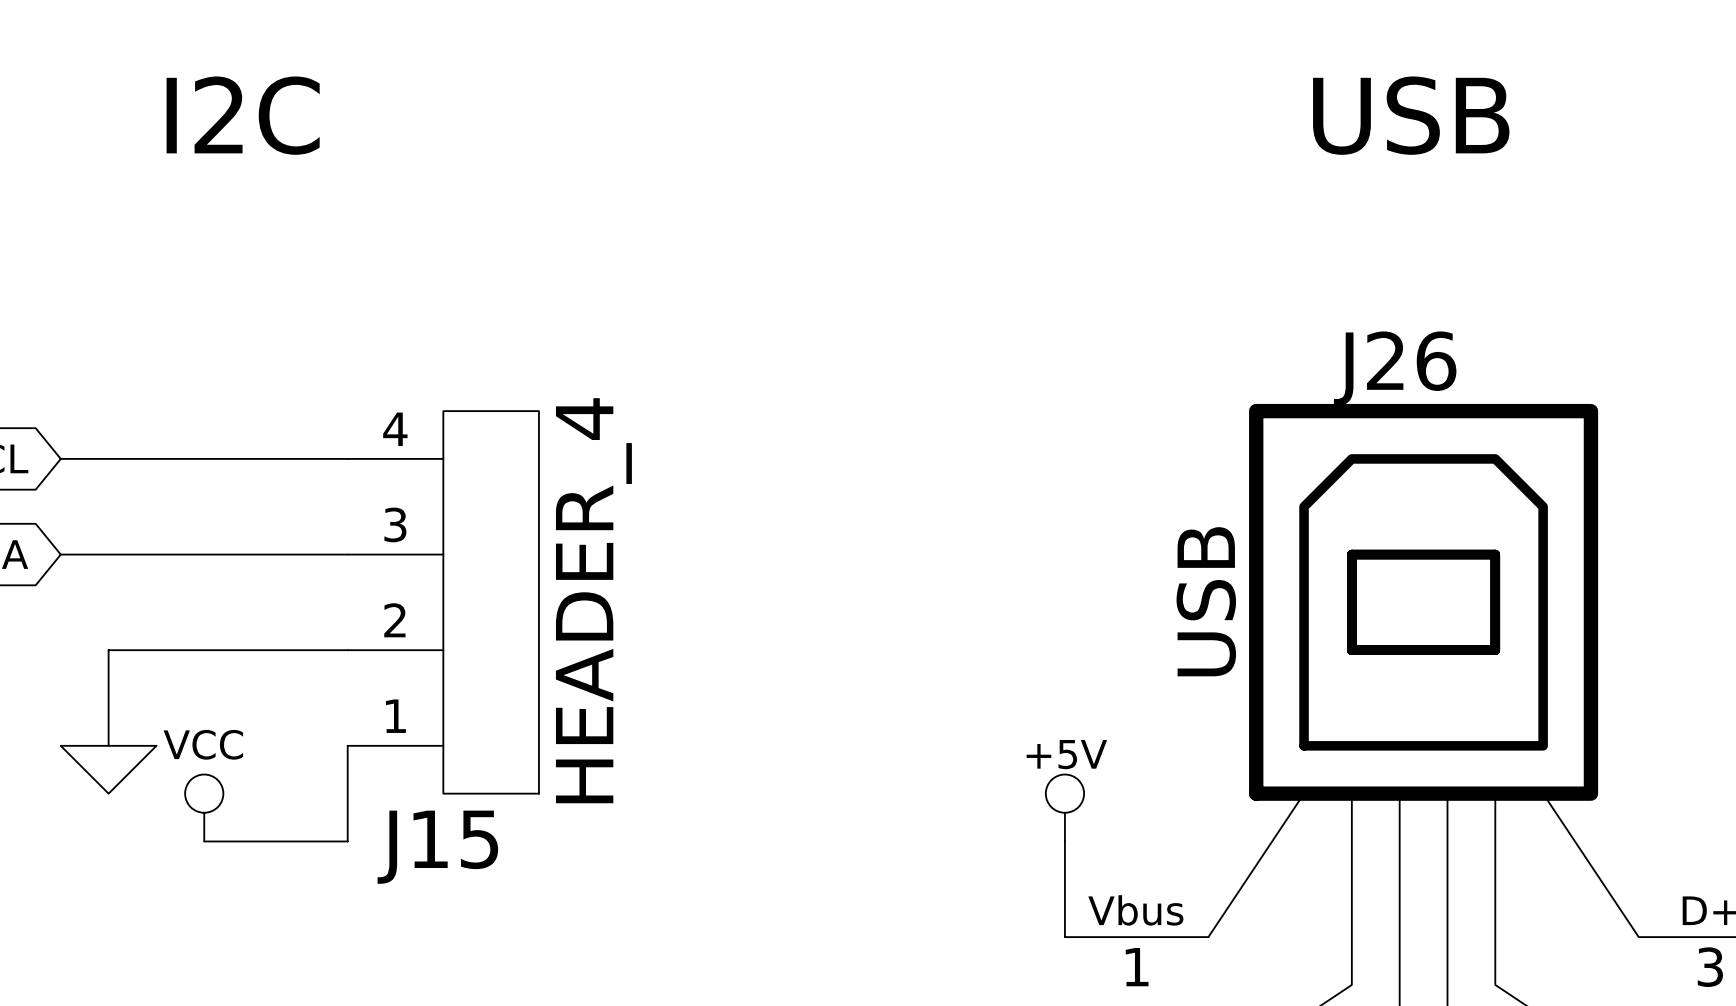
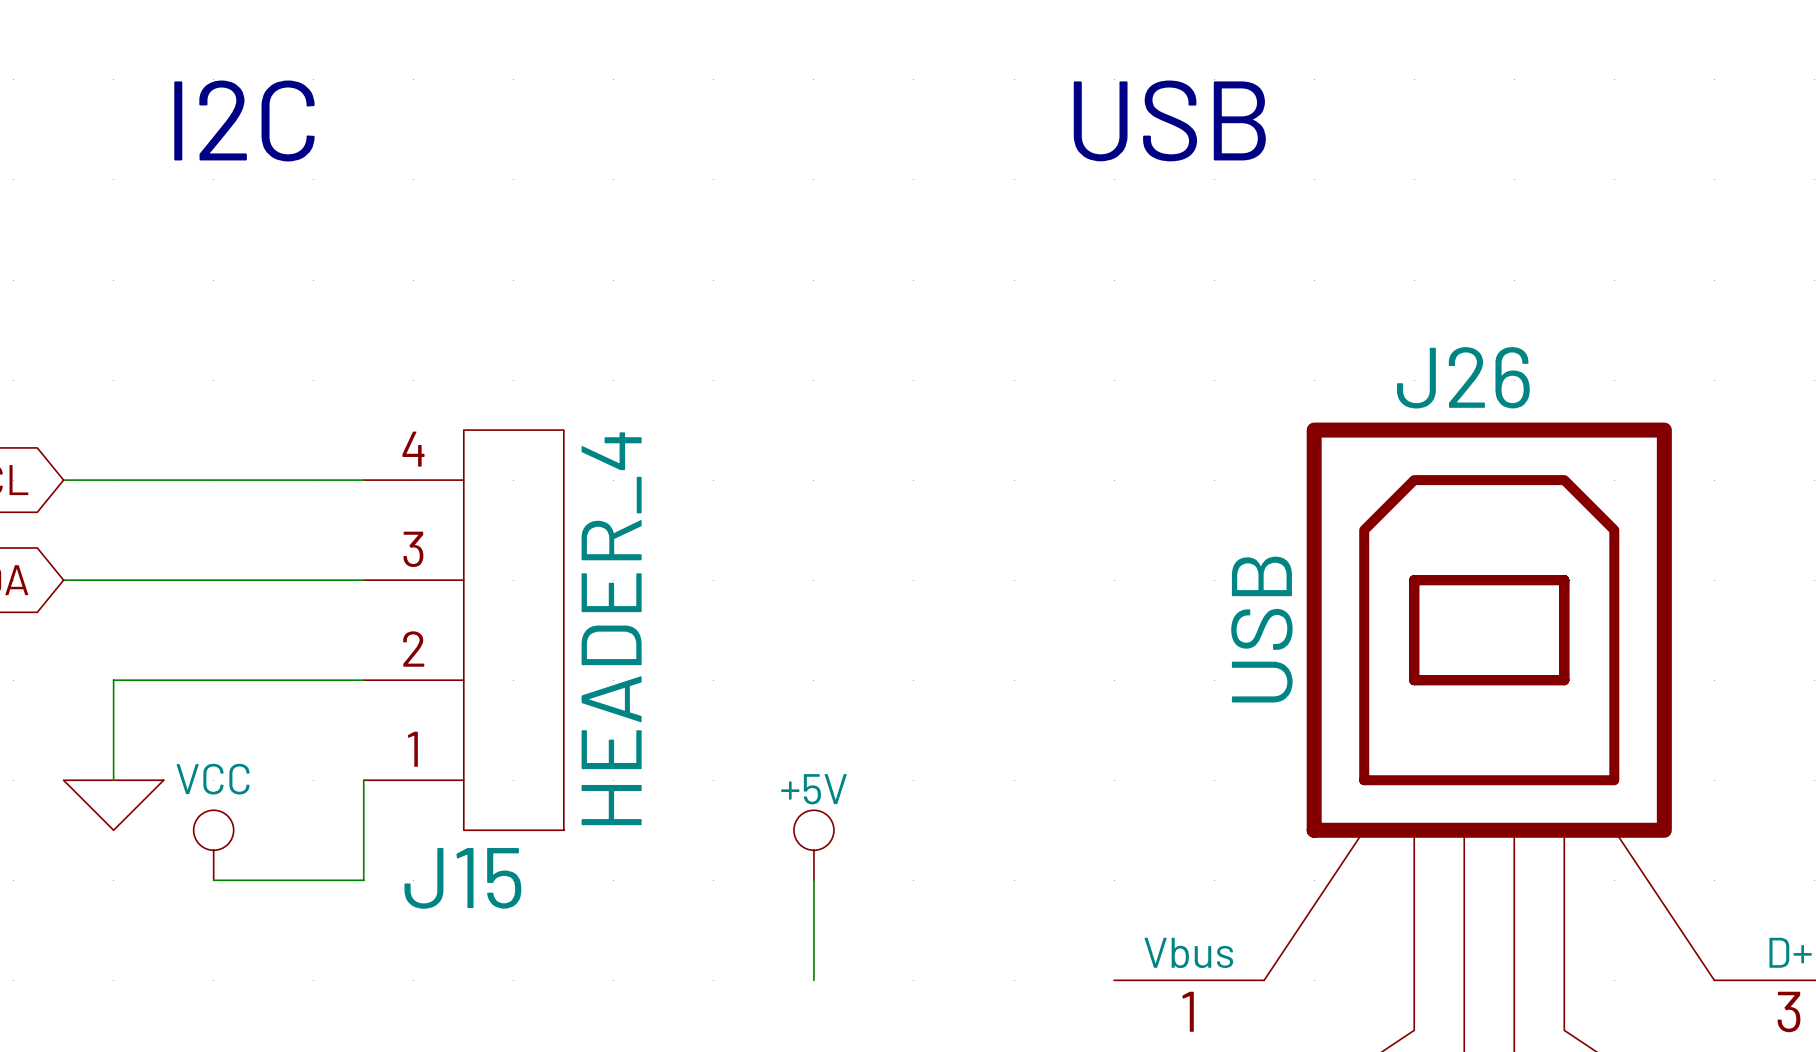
text position: USB (1411, 115) -> USB (1169, 120)
power symbol position: +5V (1064, 807) -> +5V (813, 845)
wire: (1064, 841) (1064, 937) -> (813, 880) (813, 980)

